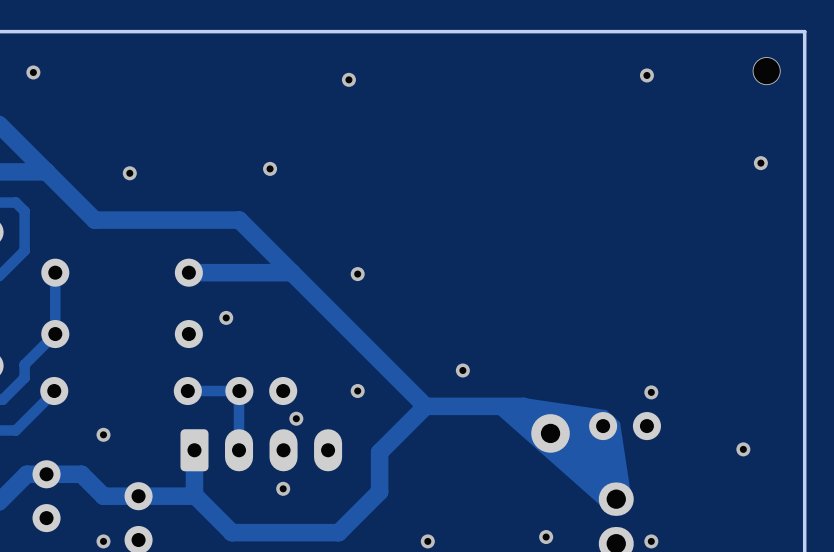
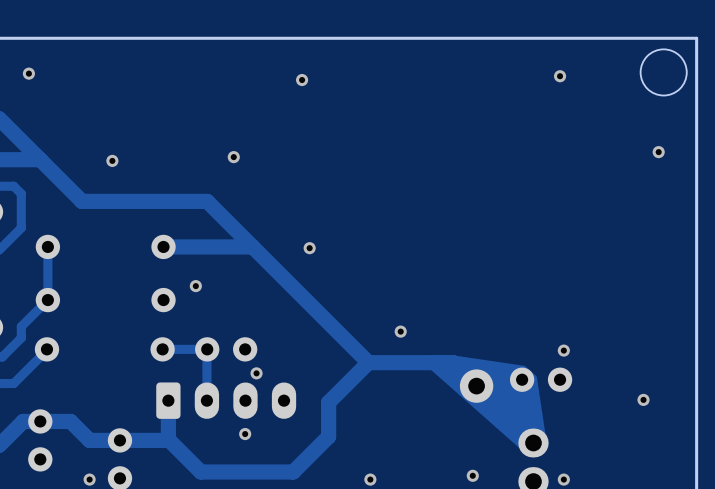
round board edge: none -> [640, 48, 688, 96]
via: (766, 71) -> none
via: (357, 391) -> none
via: (103, 434) -> none

